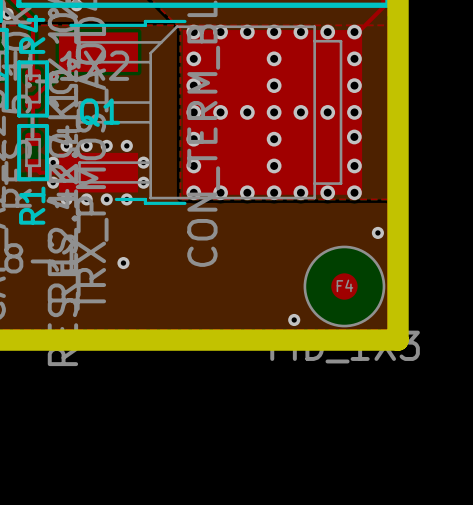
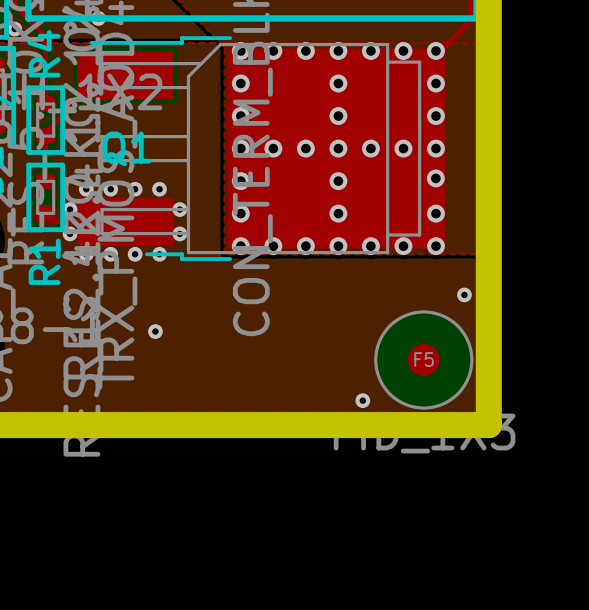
F4 name: F4 (344, 285) -> F5 (424, 359)

